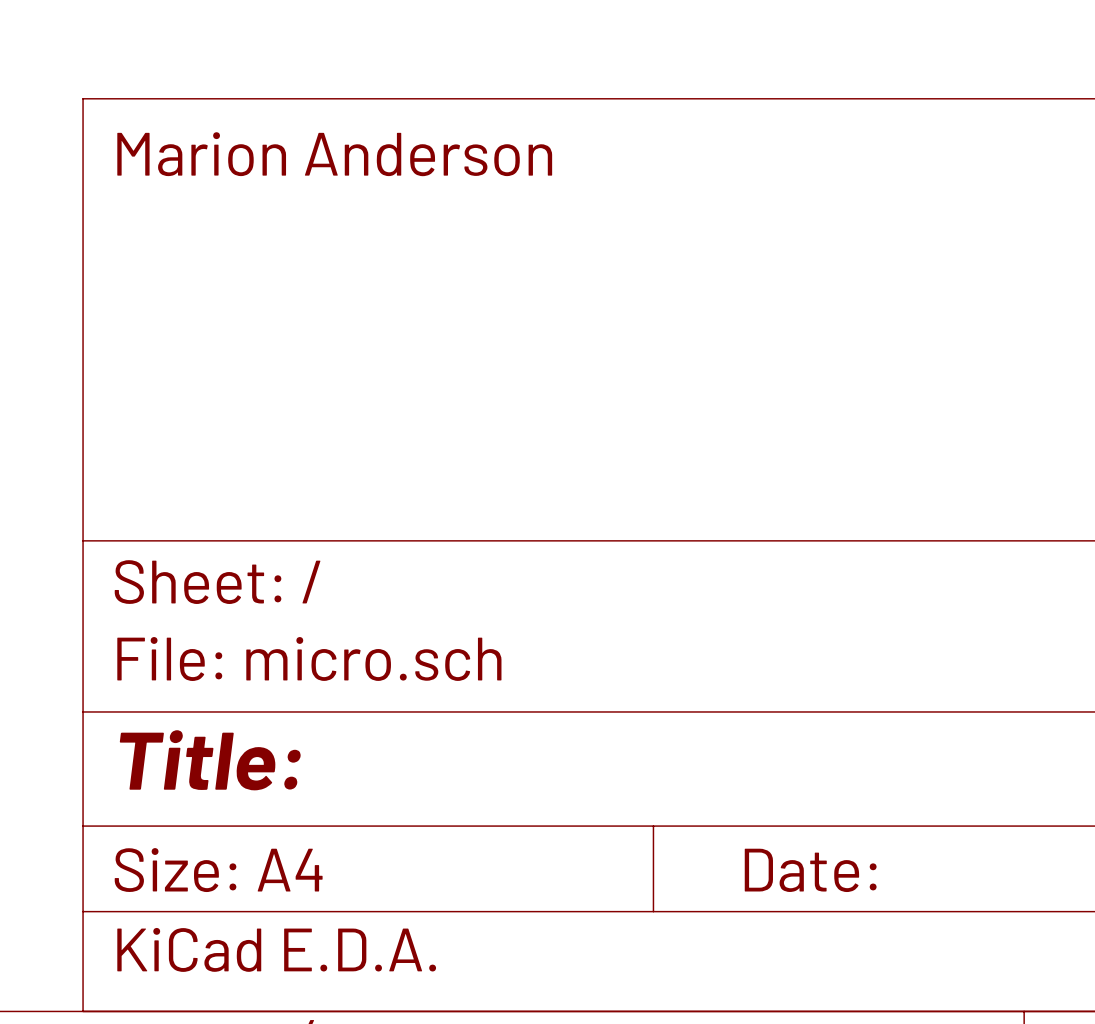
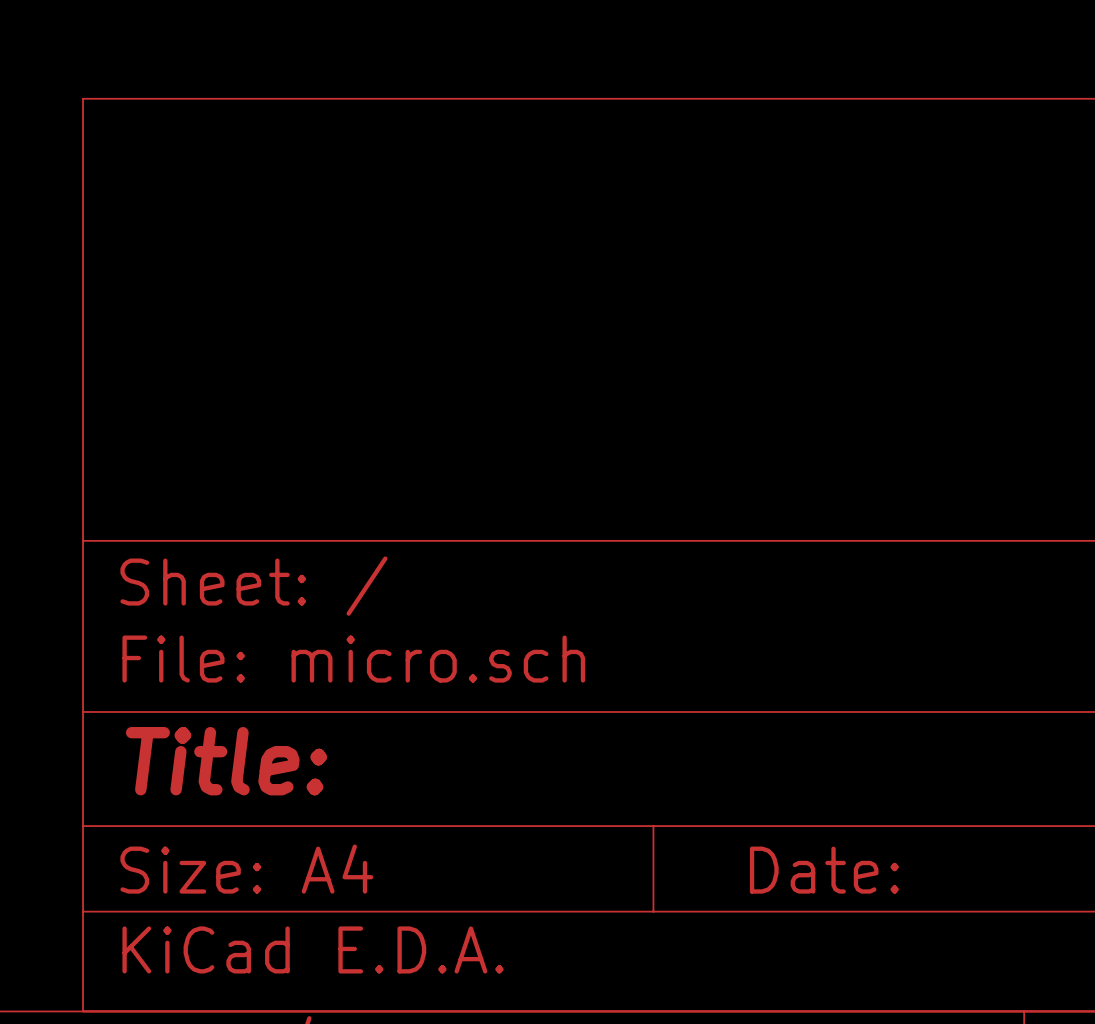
title block: Marion Anderson (334, 154) -> none

